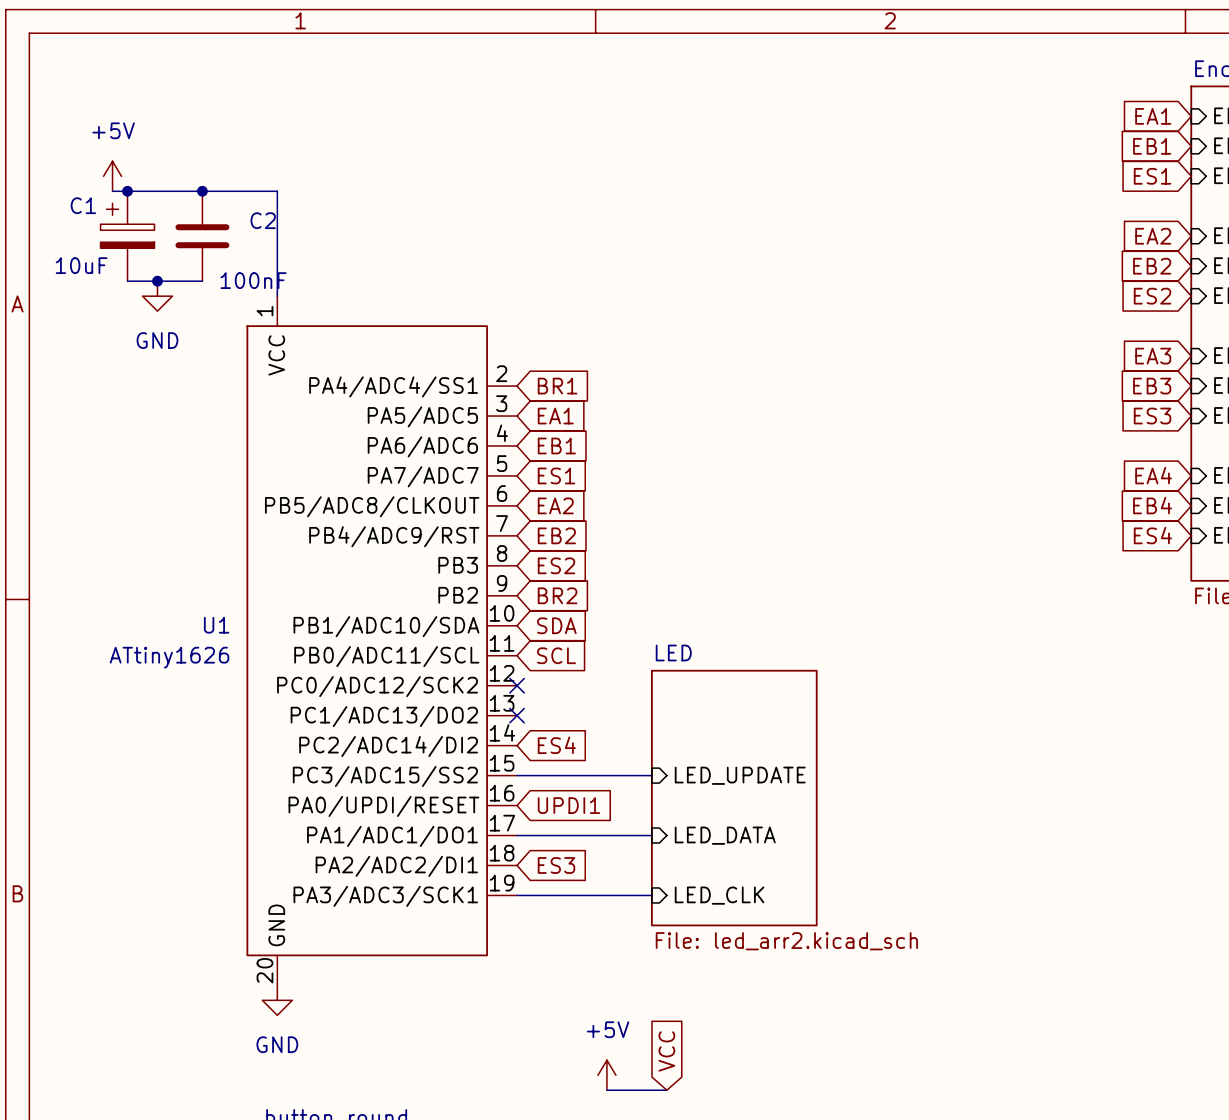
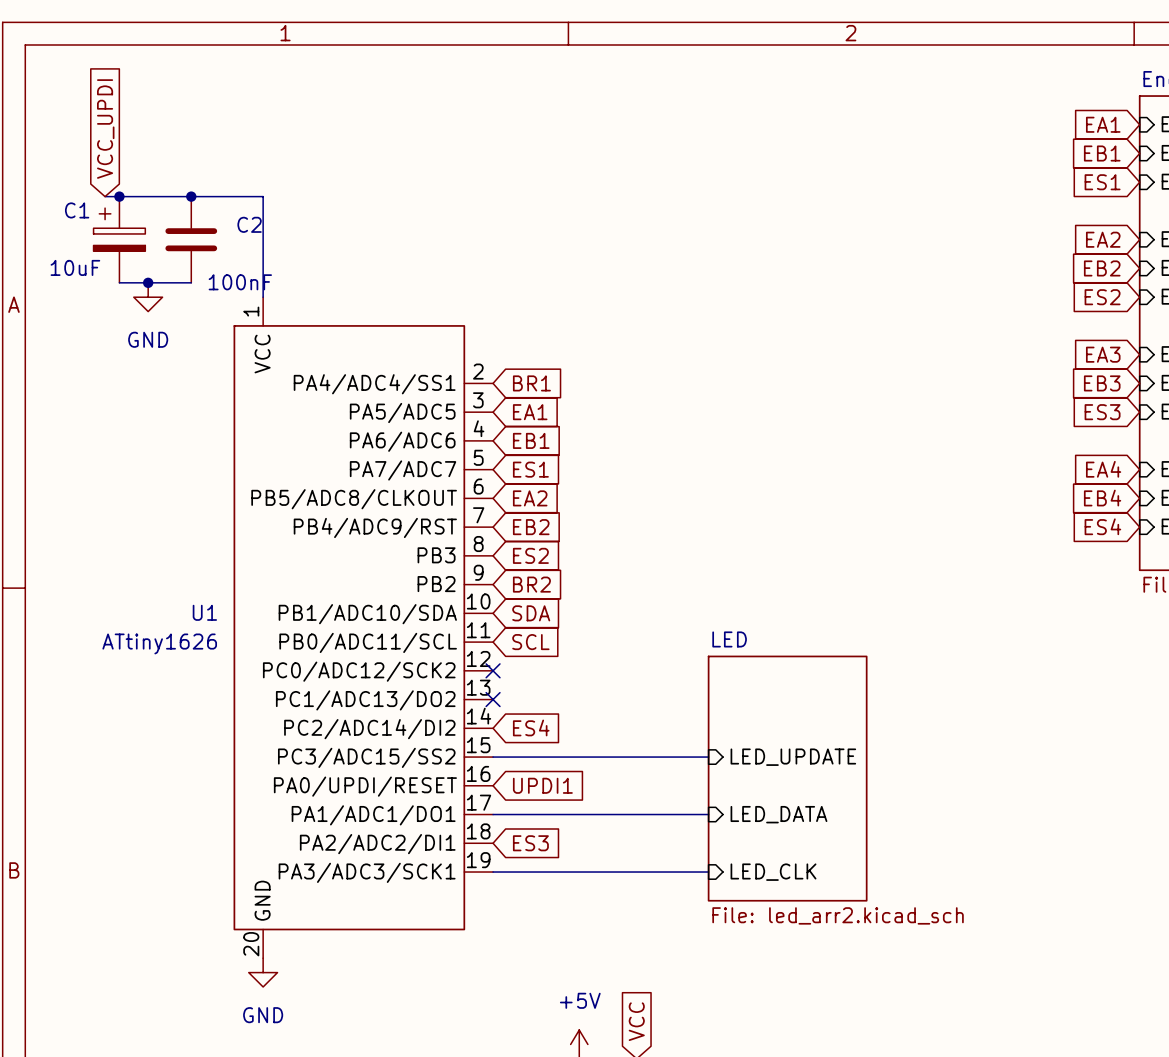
global label: none -> VCC_UPDI (105, 129)
power symbol: +5V (112, 176) -> none
wire: none -> (622, 757) (708, 757)
sheet pin position: LED_UPDATE (740, 775) -> LED_UPDATE (793, 757)
sheet LED position: (734, 798) -> (787, 778)
wire: none -> (622, 814) (708, 814)
sheet pin position: LED_DATA (725, 835) -> LED_DATA (778, 814)
wire: none -> (622, 872) (708, 872)
sheet pin position: LED_CLK (719, 895) -> LED_CLK (773, 872)

